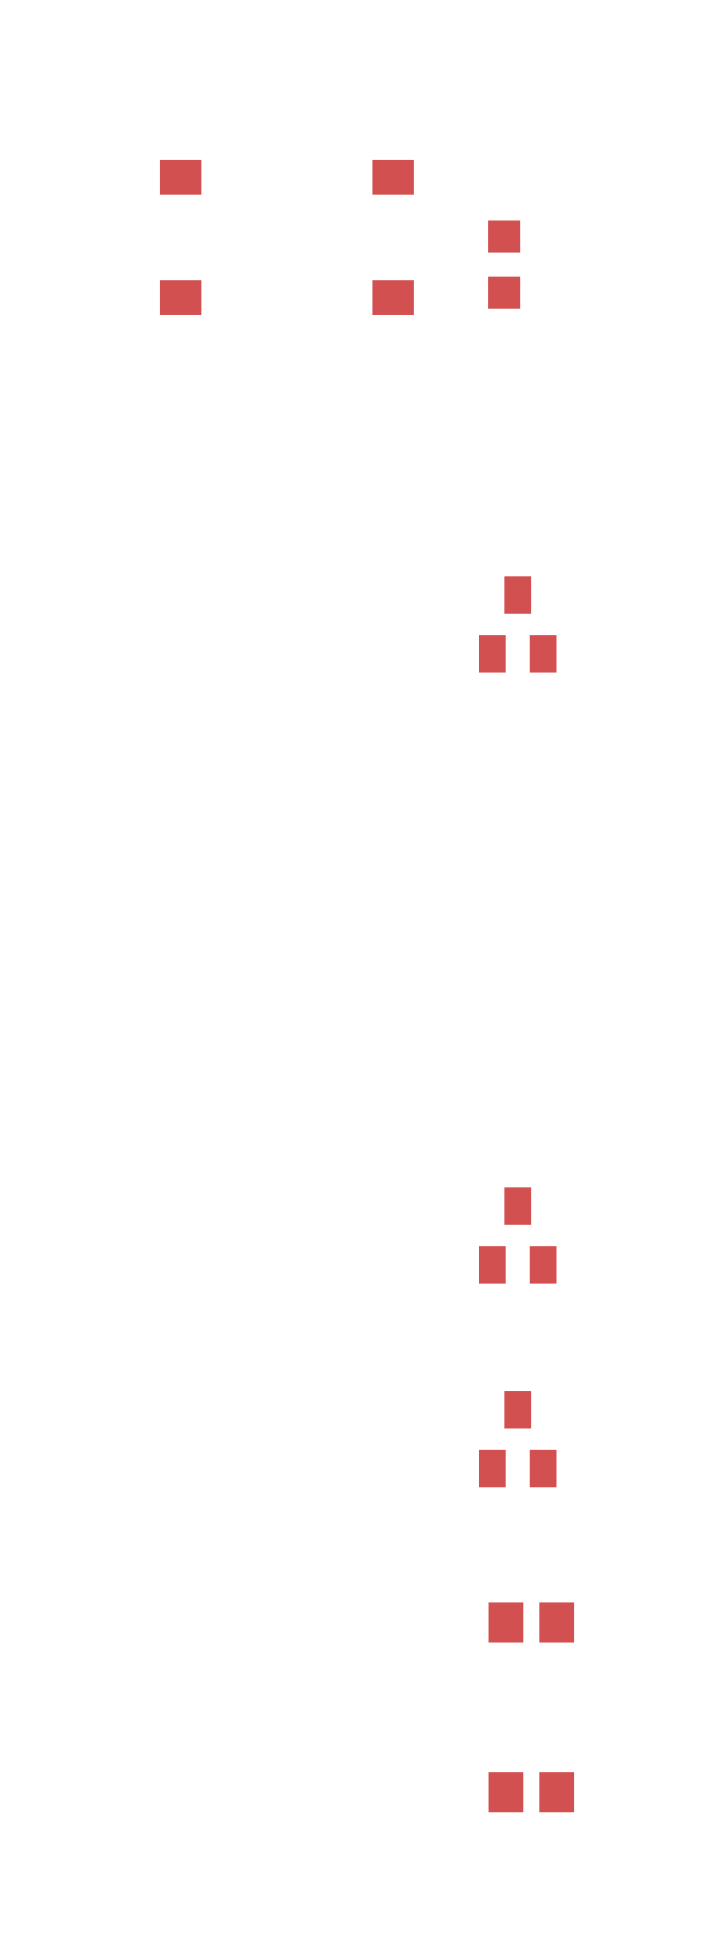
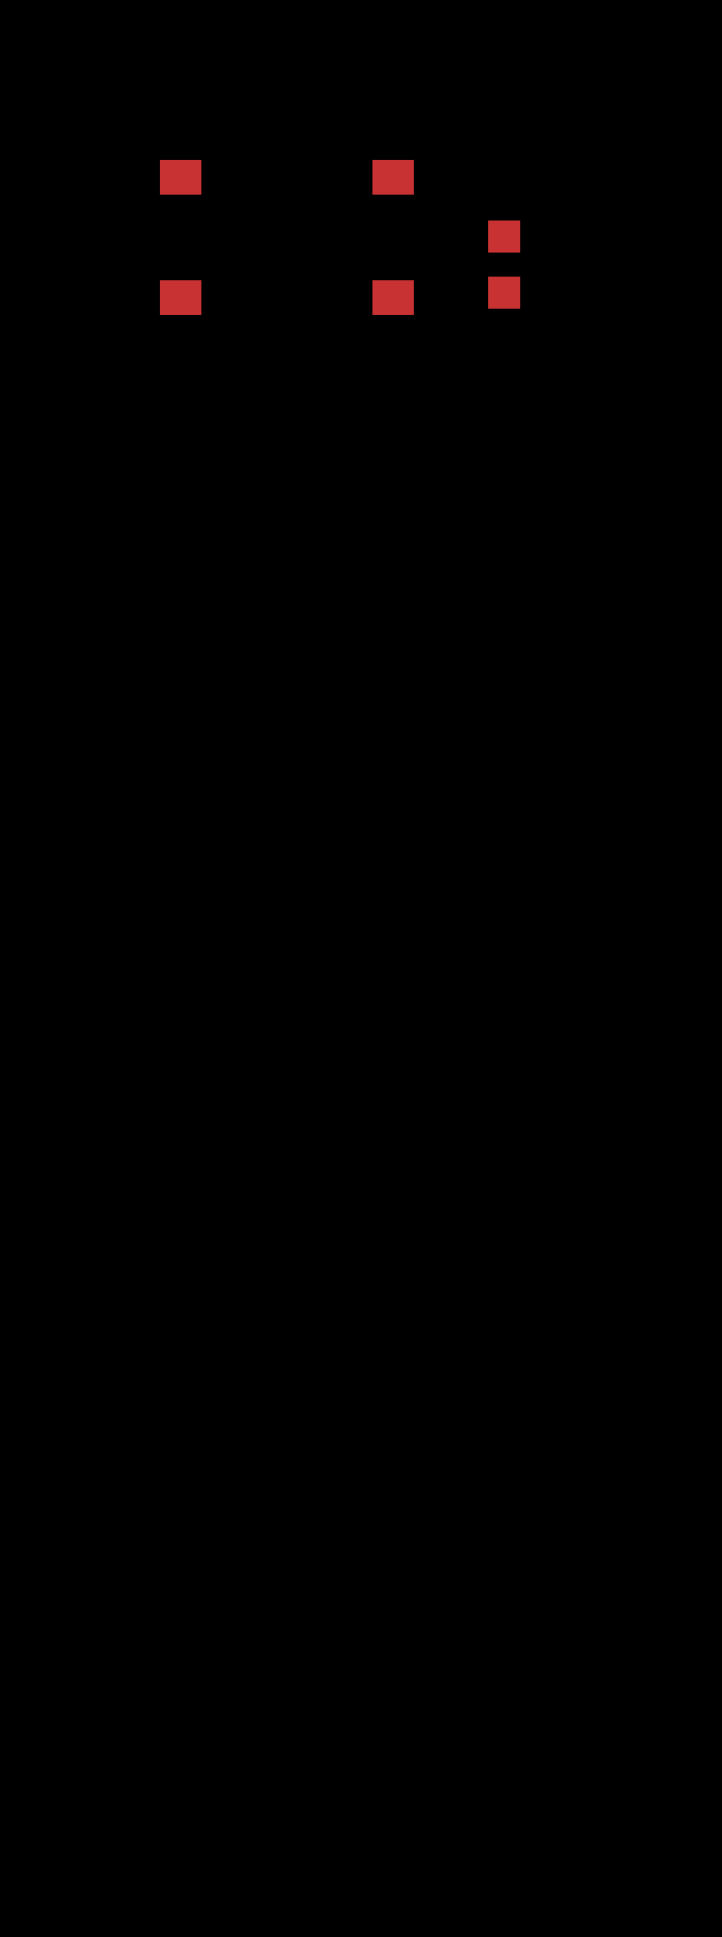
part: (517, 624) -> none
part: (517, 1235) -> none
part: (517, 1439) -> none
part: (531, 1622) -> none
part: (531, 1792) -> none

